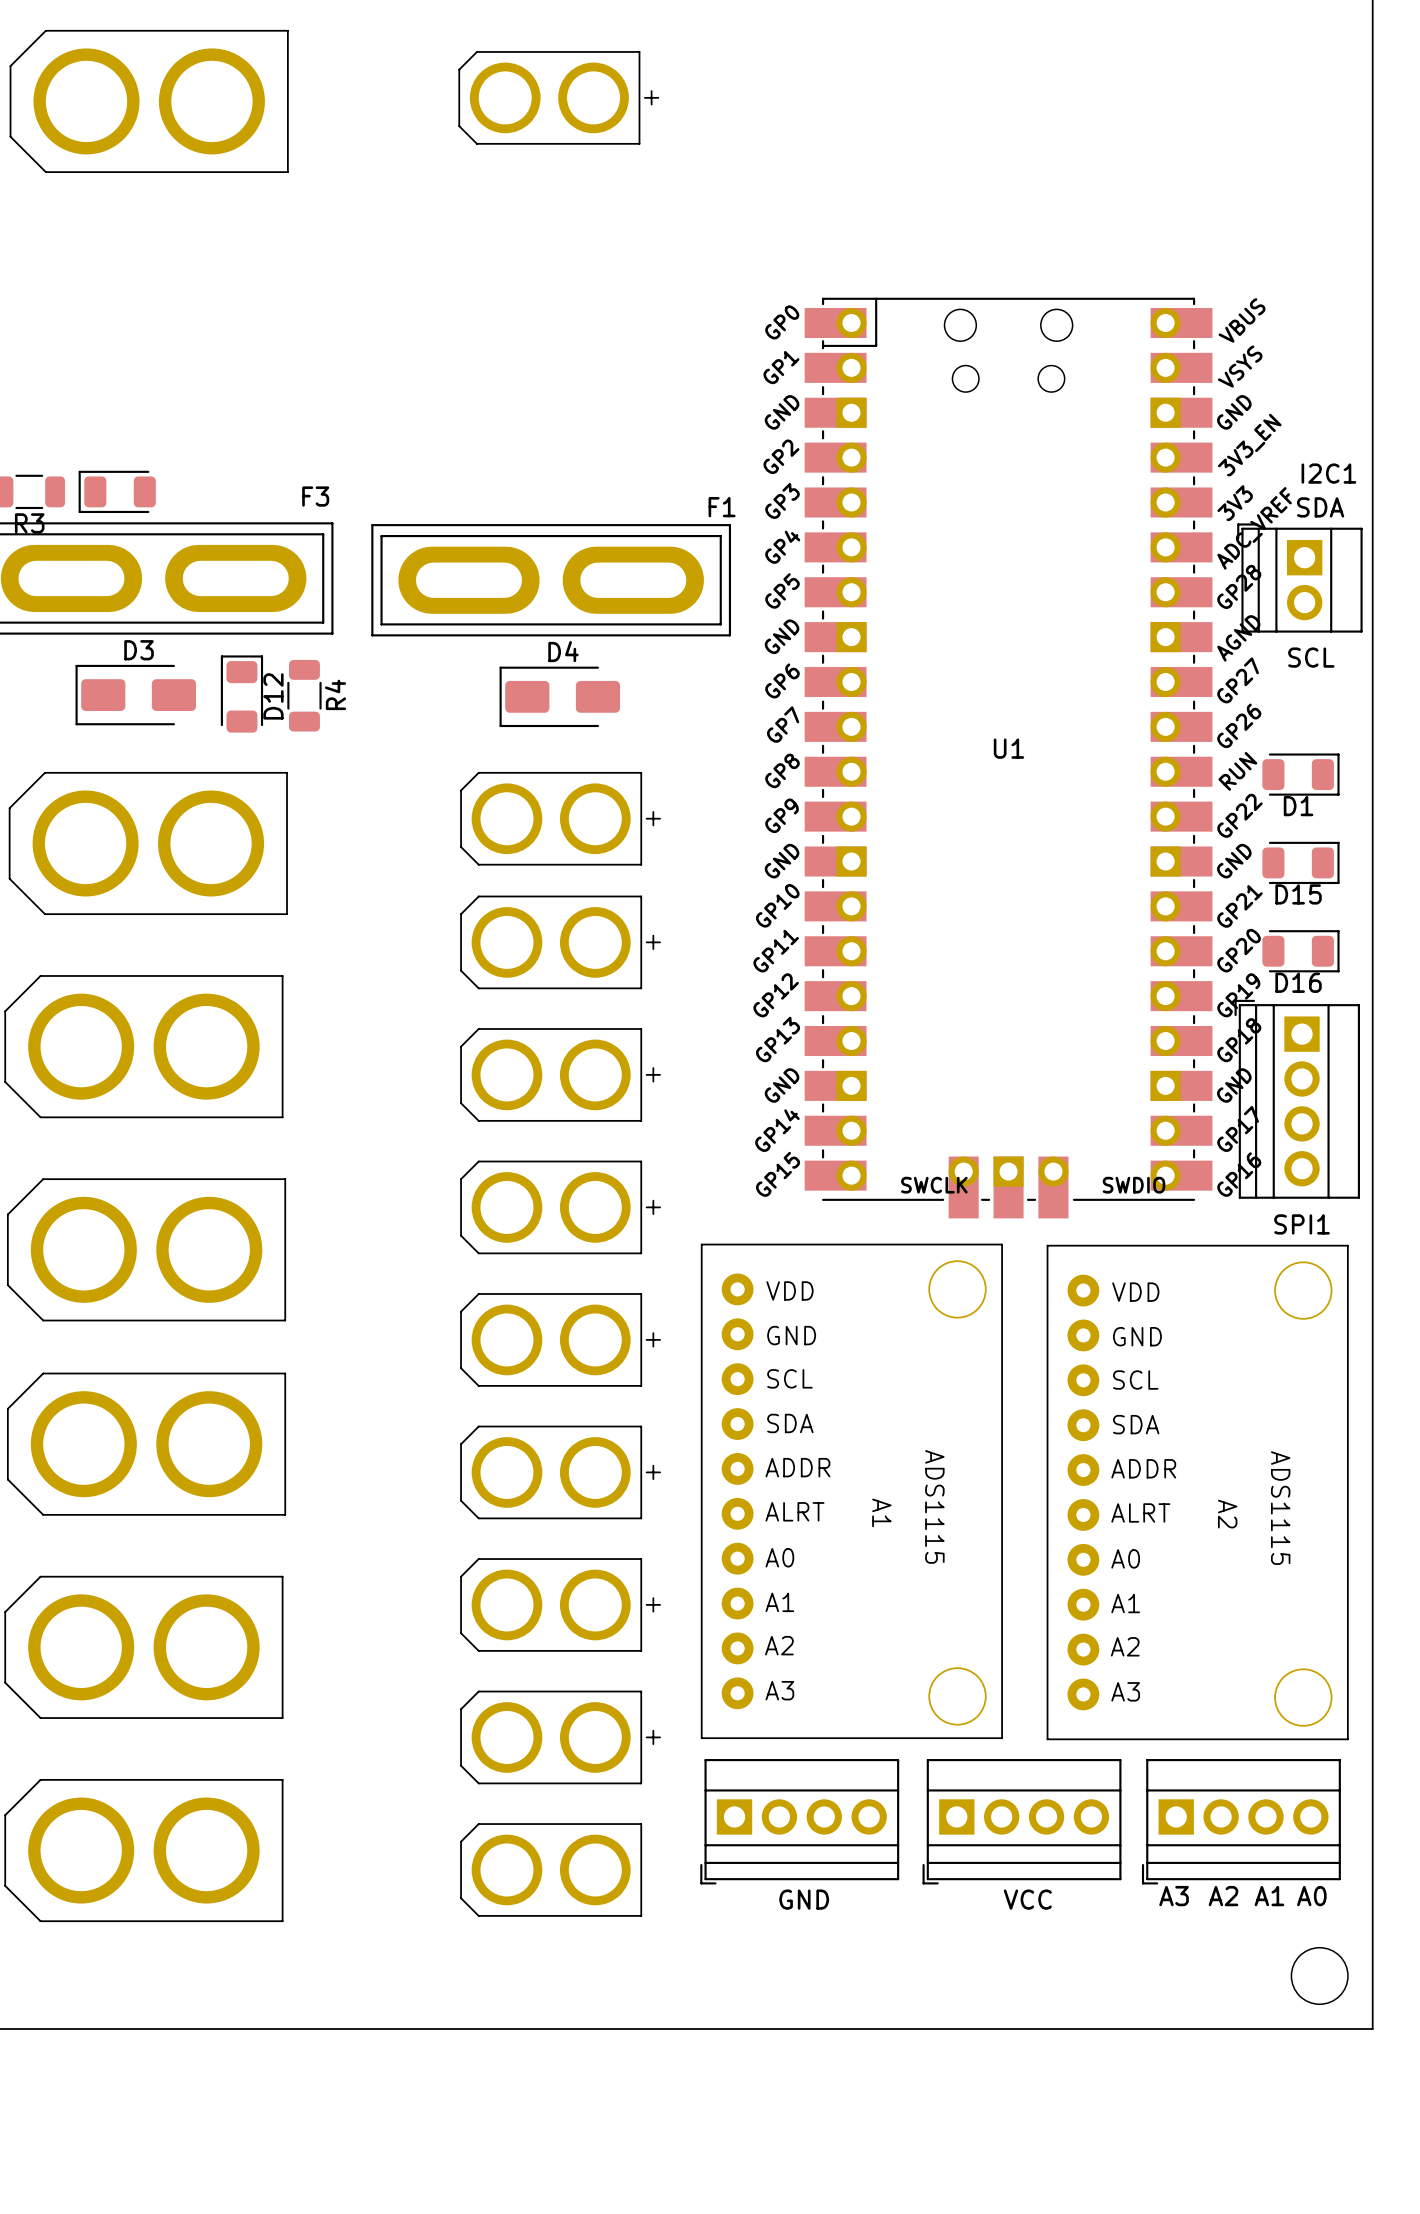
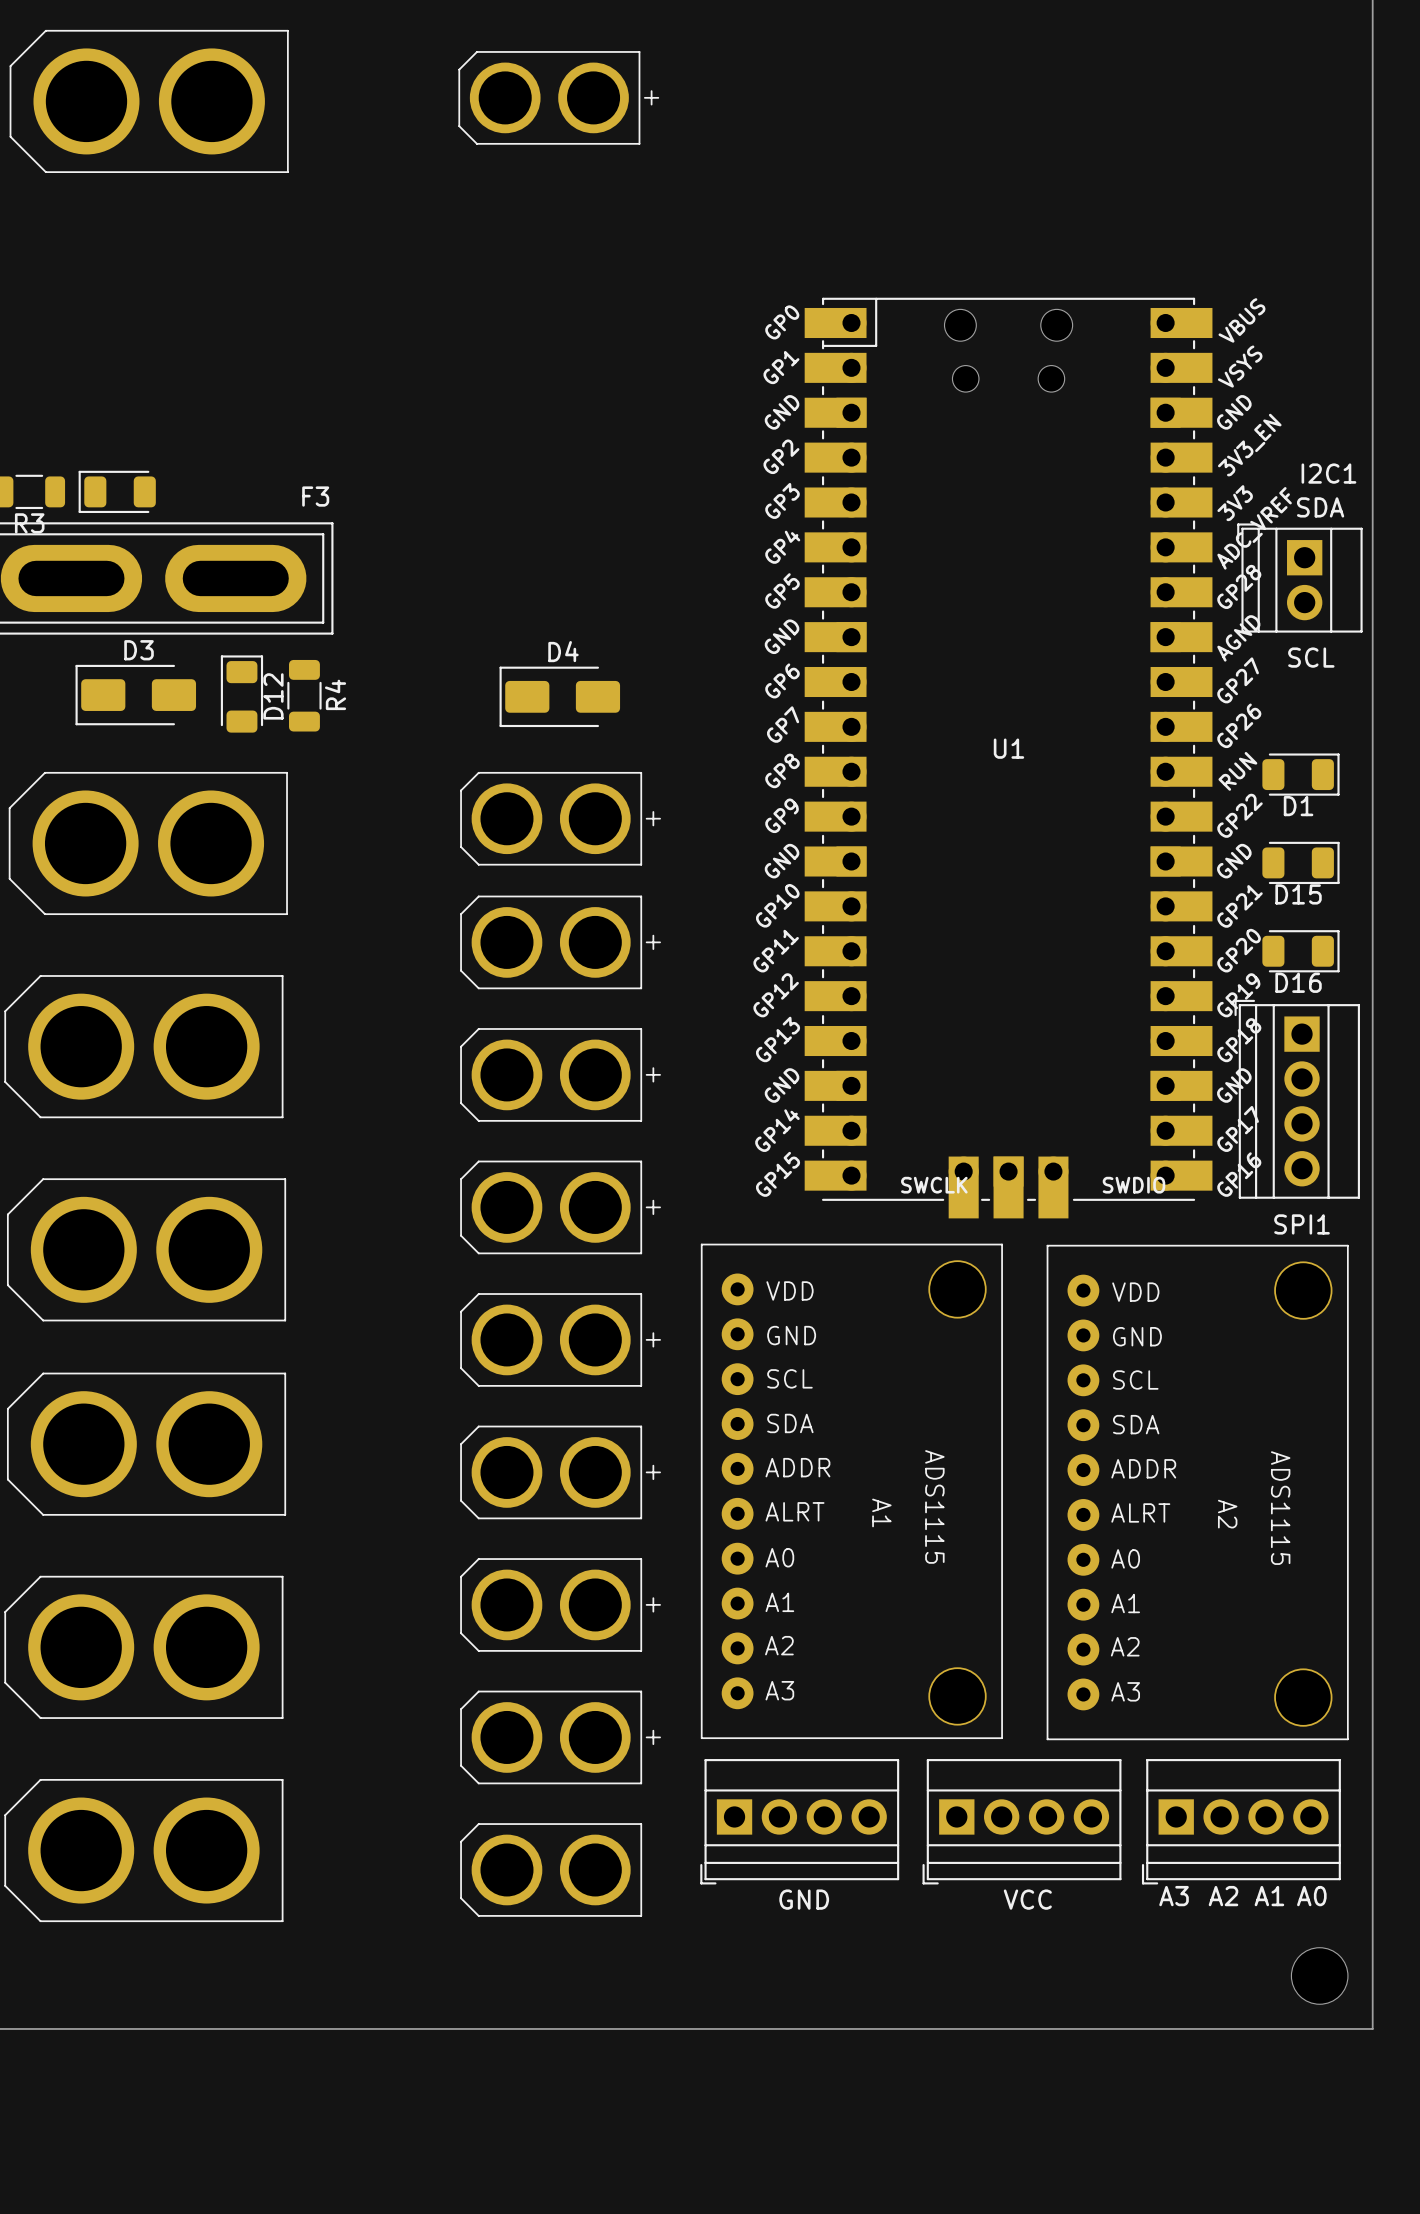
F1: (551, 580) -> none

